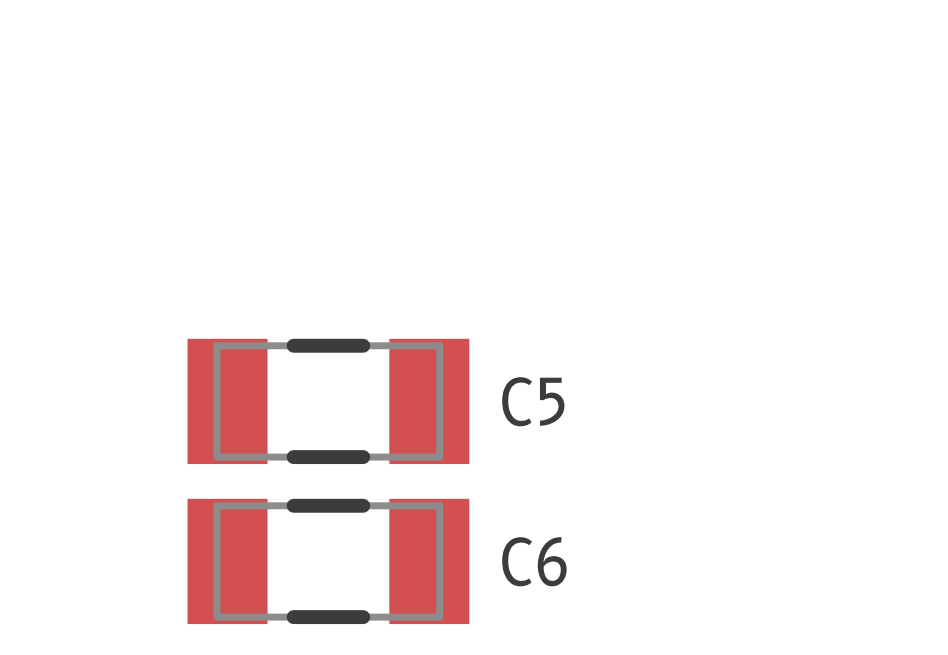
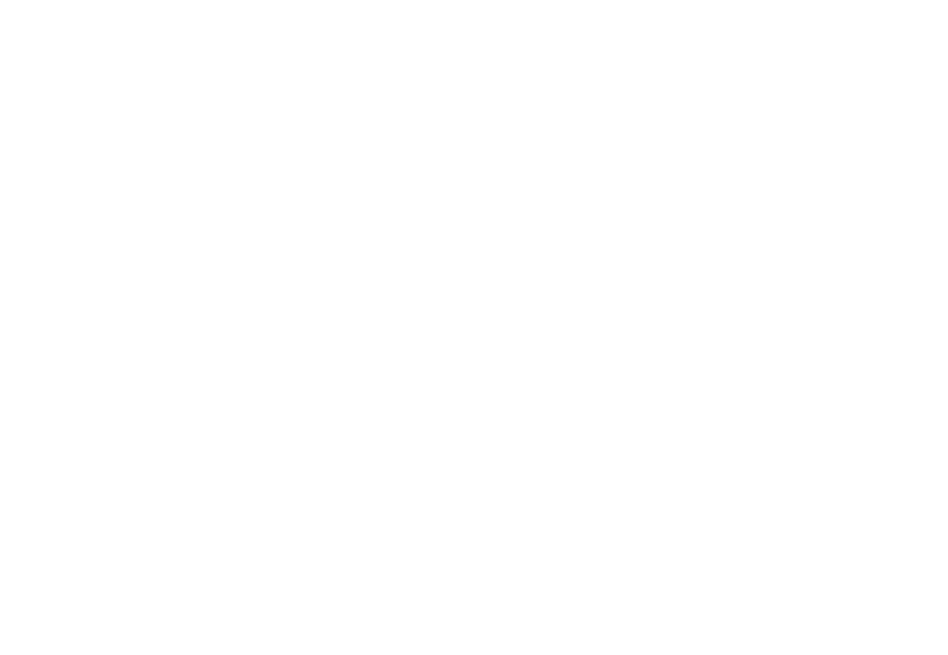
C5: (328, 401) -> none
C6: (328, 561) -> none

